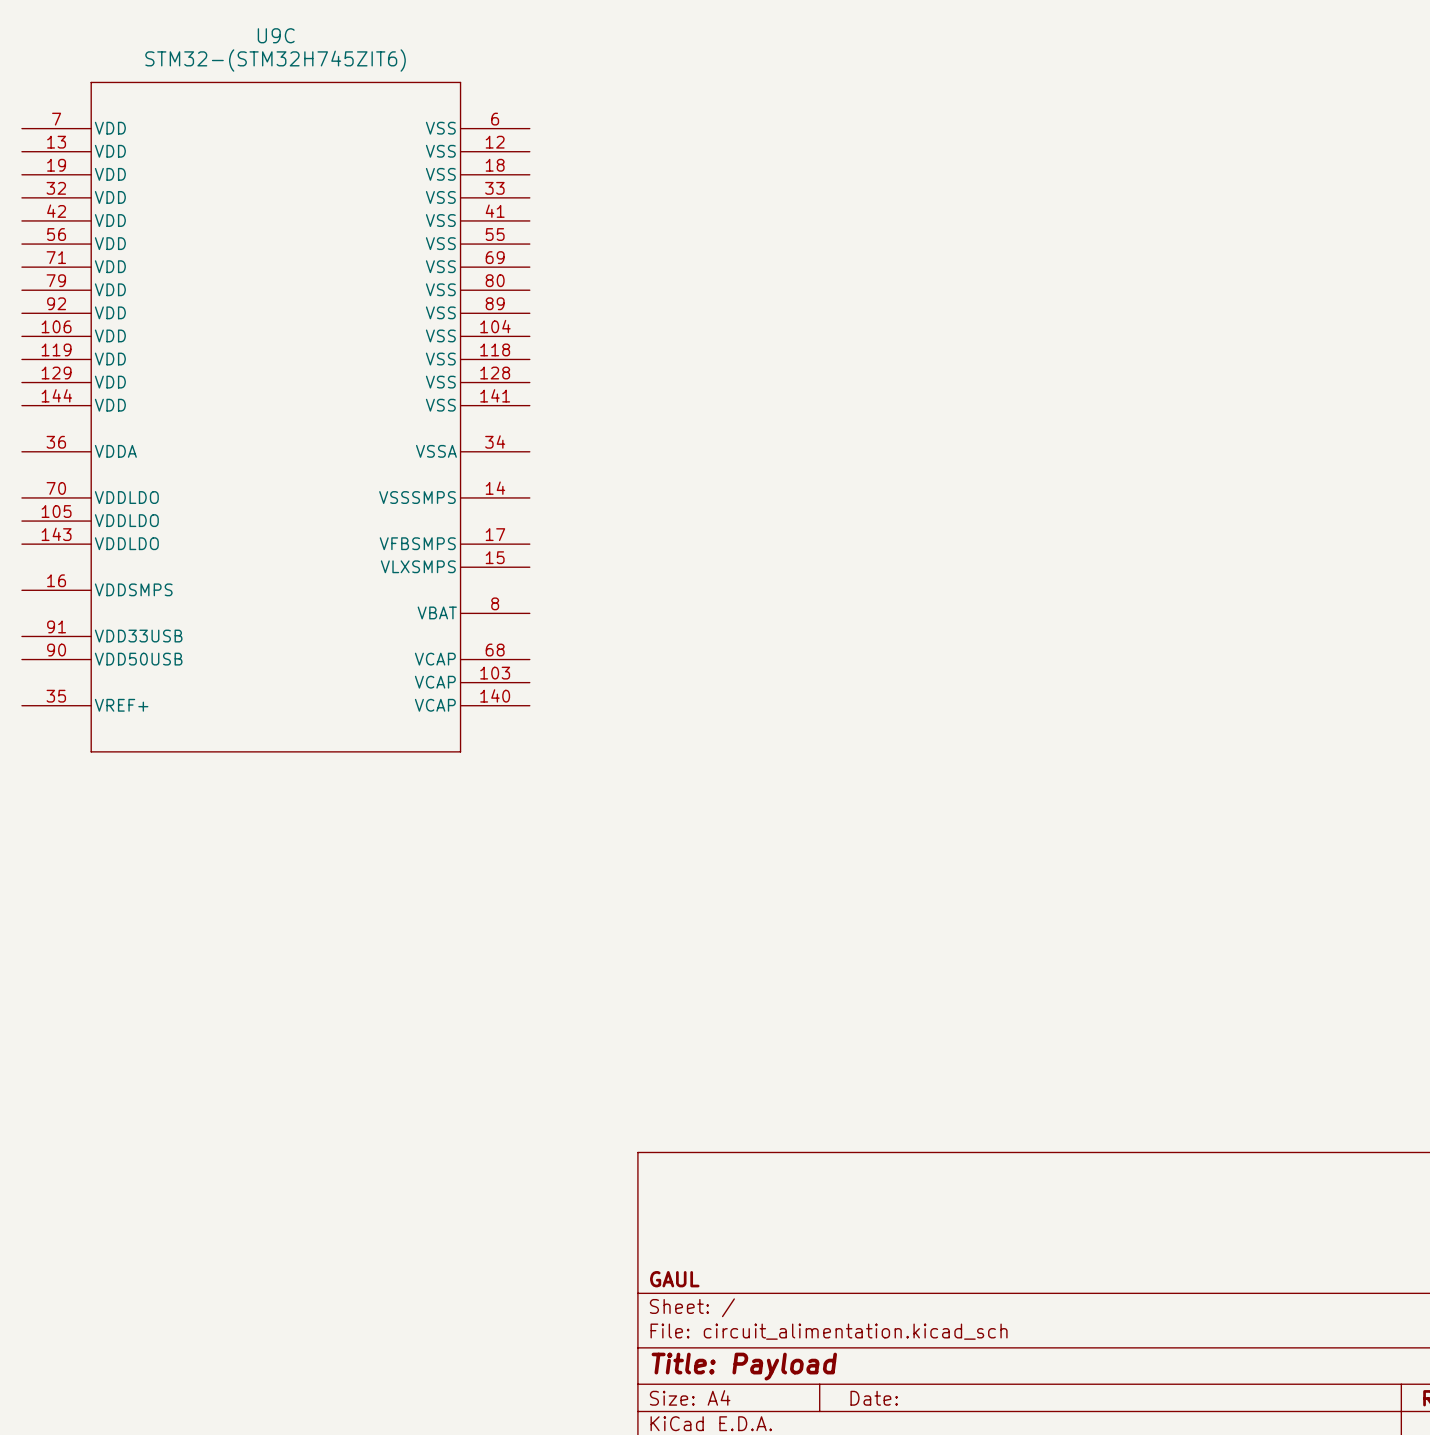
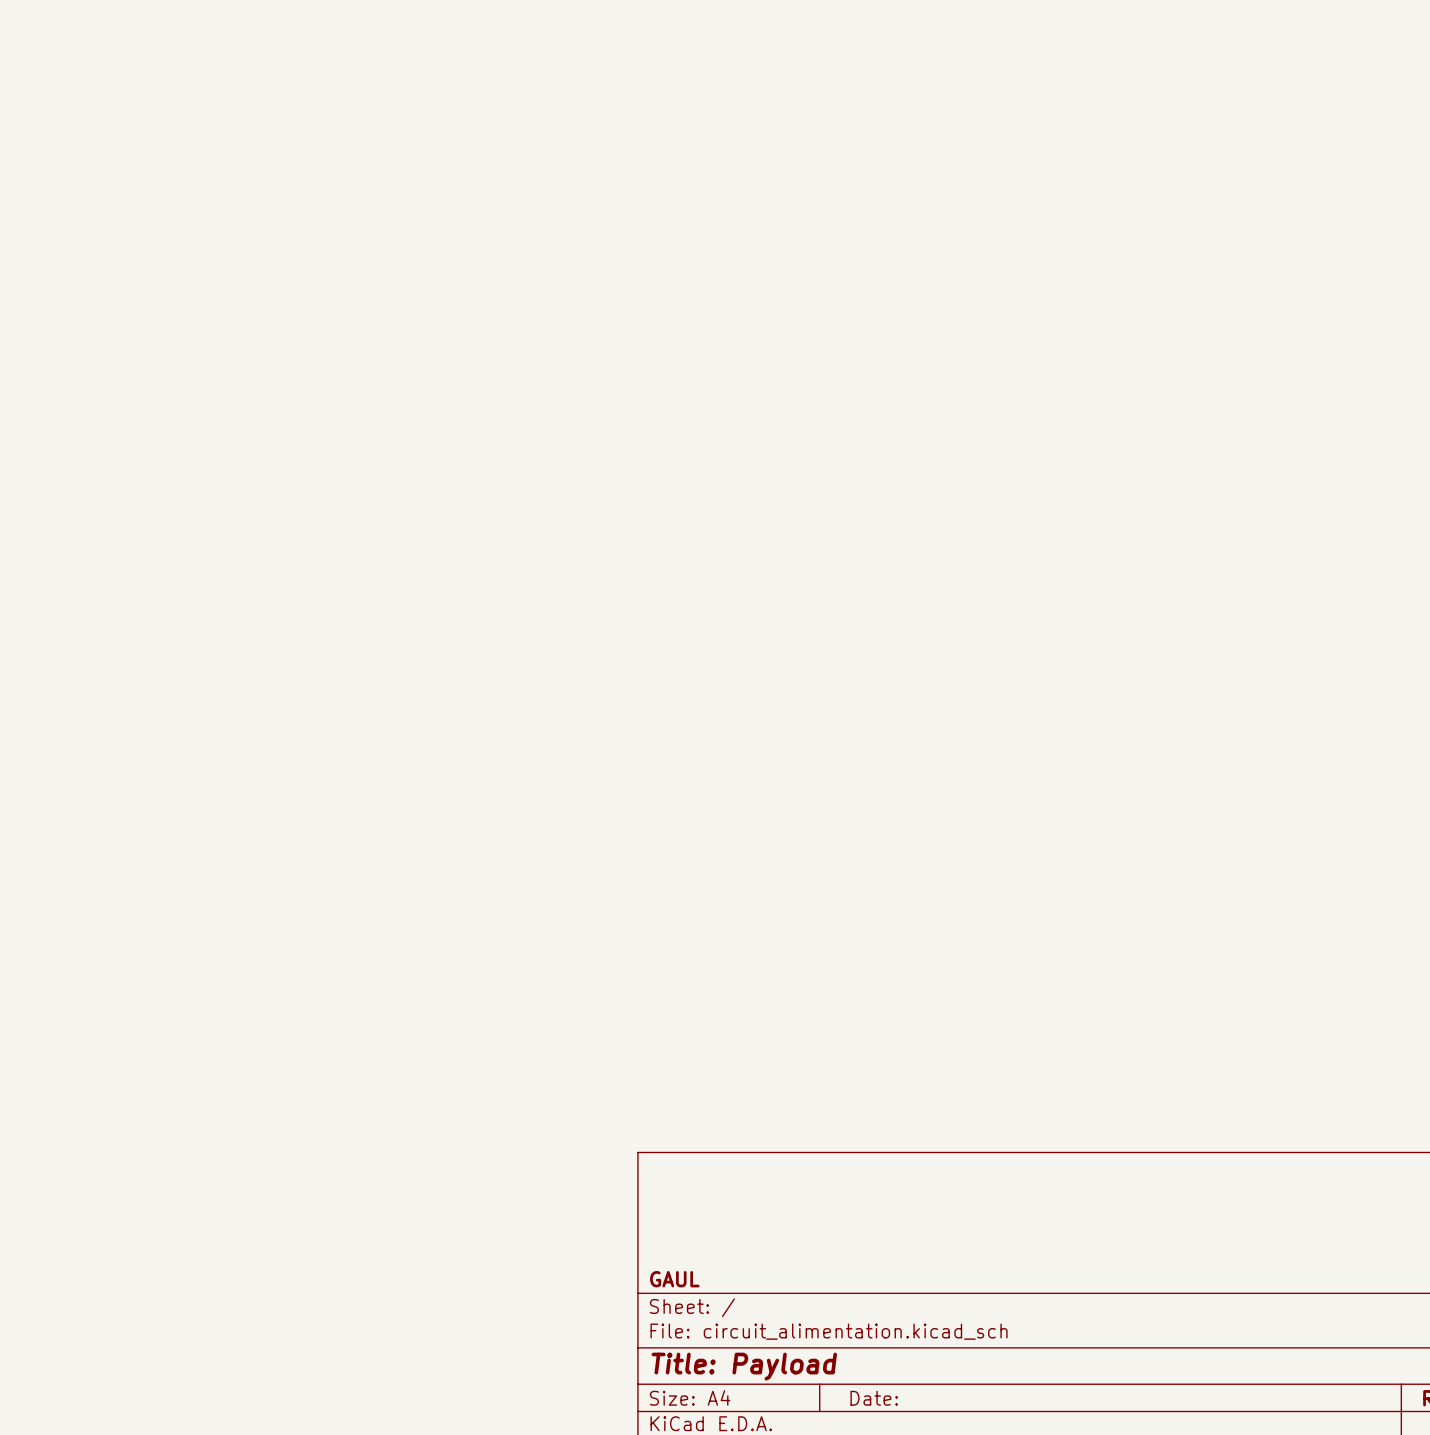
U9C: STM32-(STM32H745ZIT6) (275, 417) -> none

